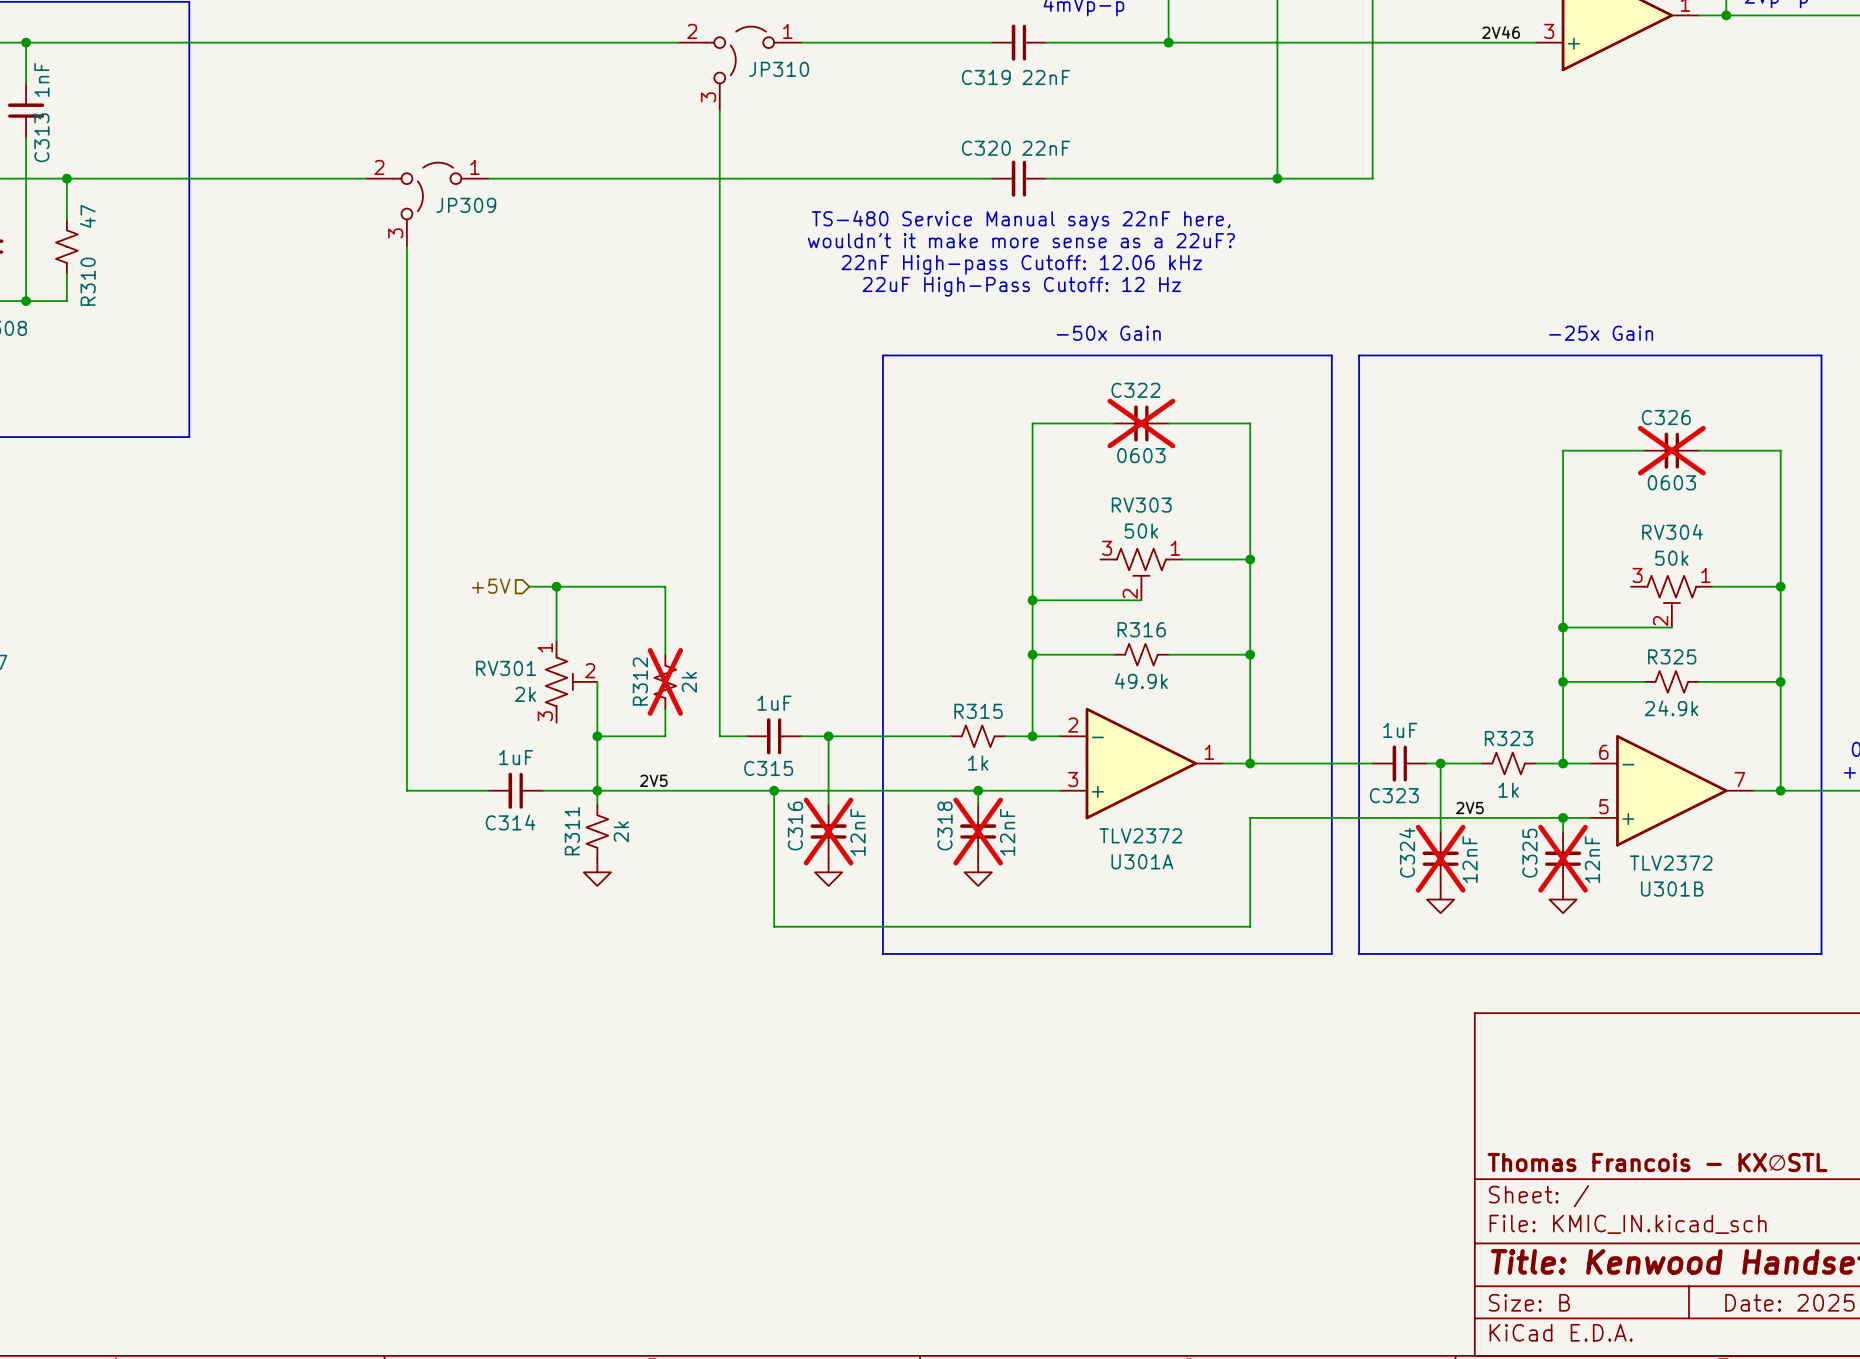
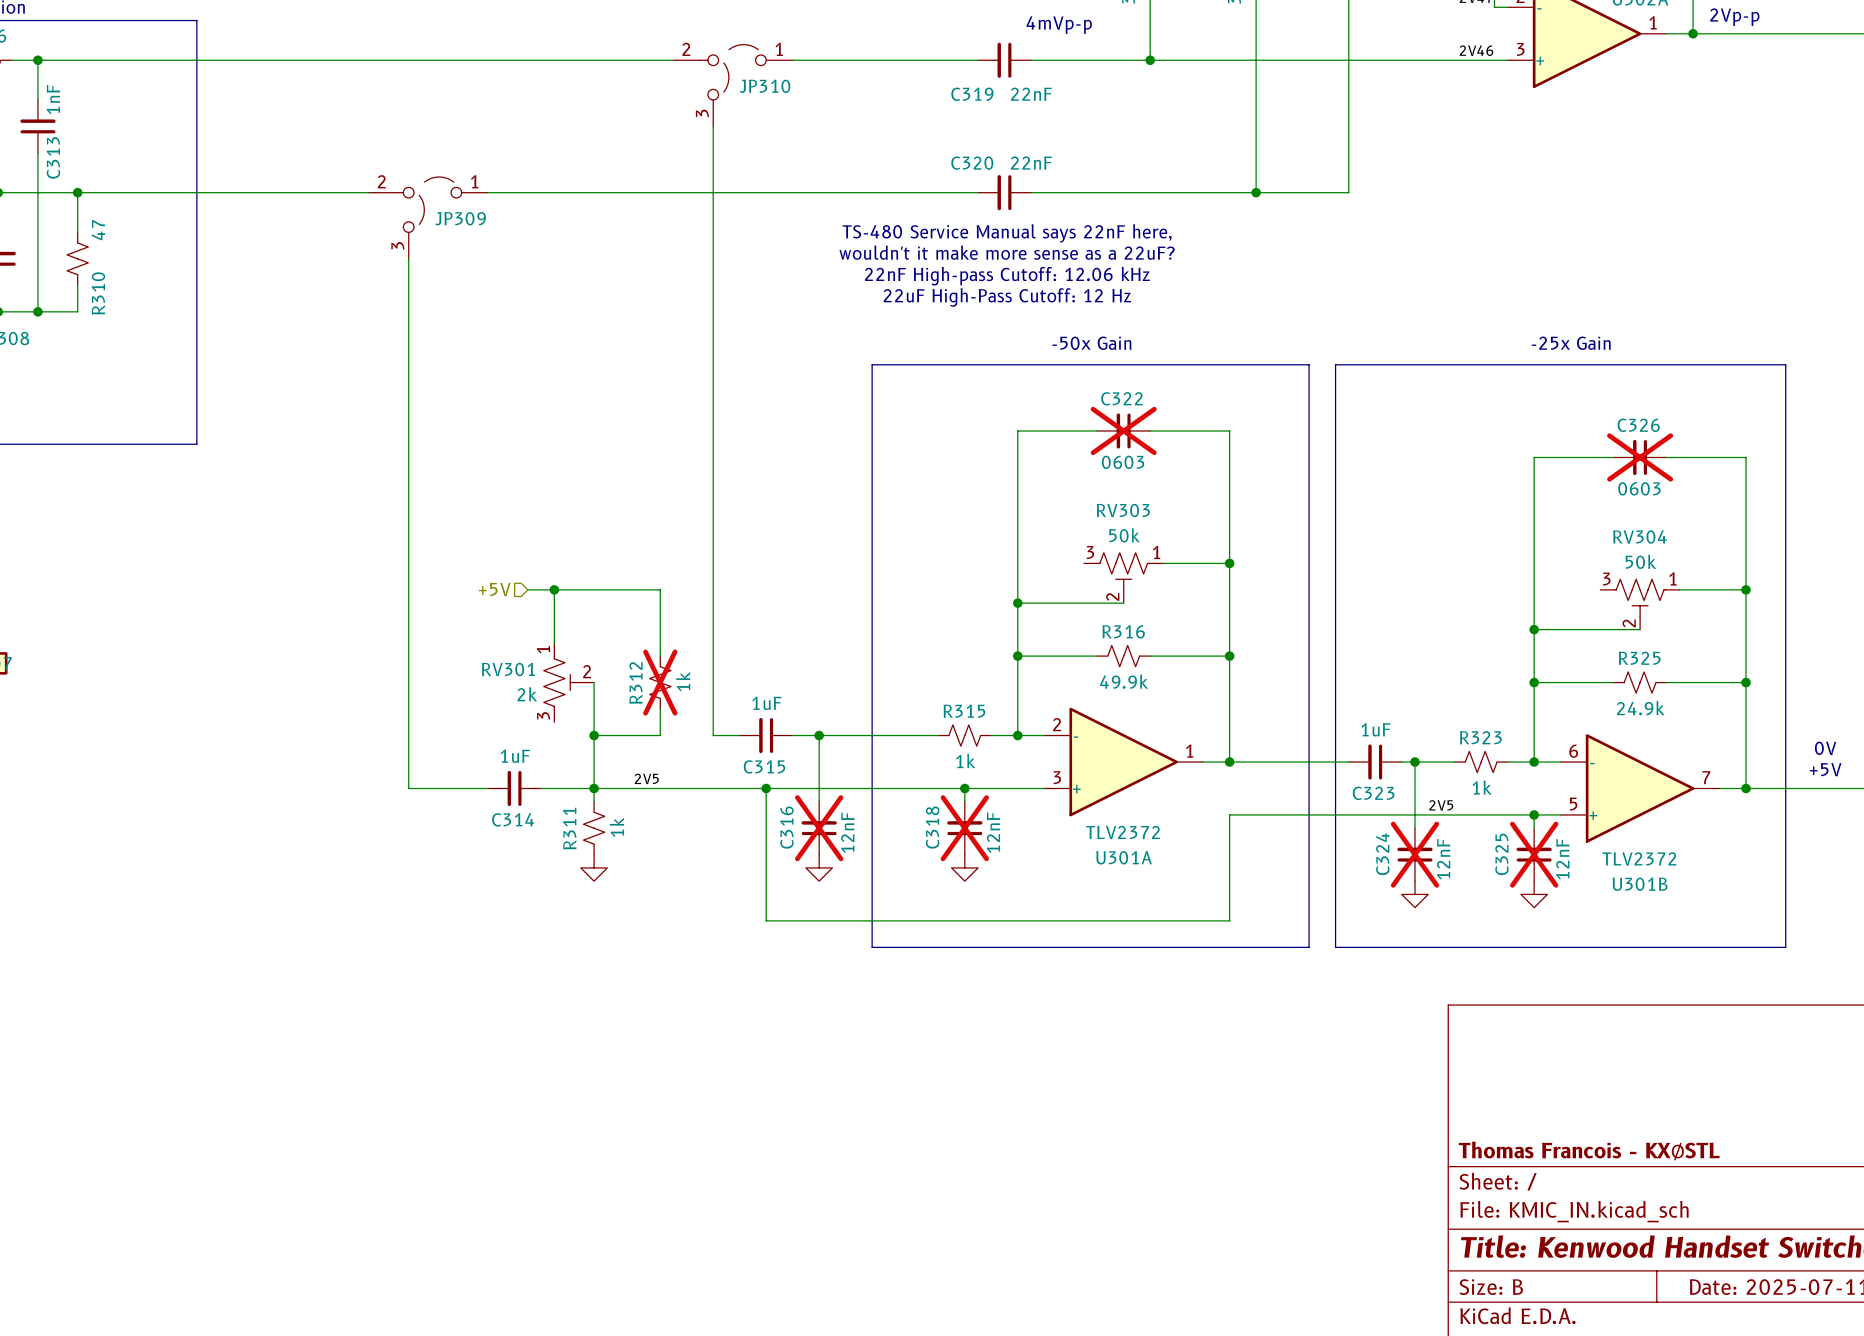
R312 value: 2k (689, 682) -> 1k (683, 681)
R311 value: 2k (621, 831) -> 1k (616, 827)

